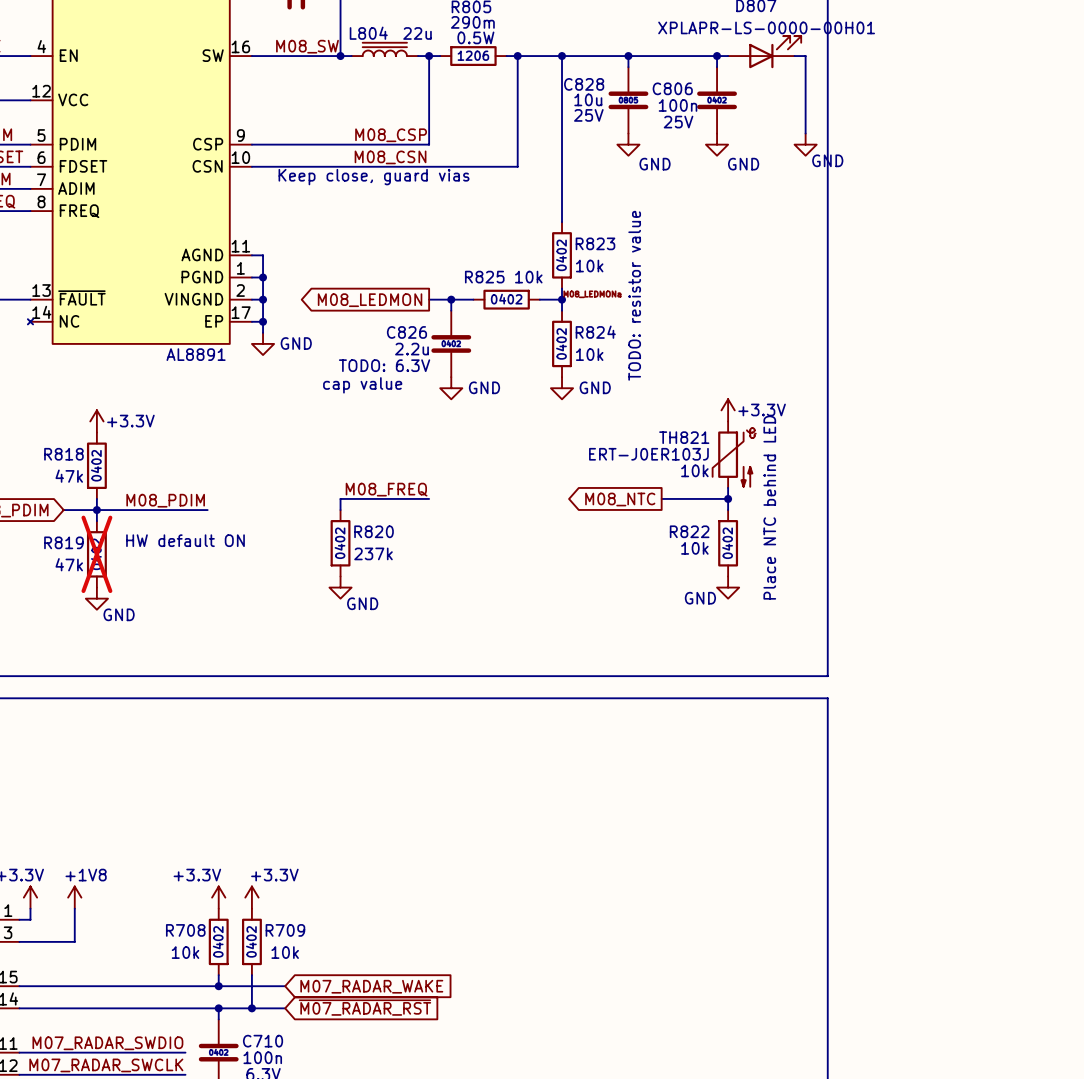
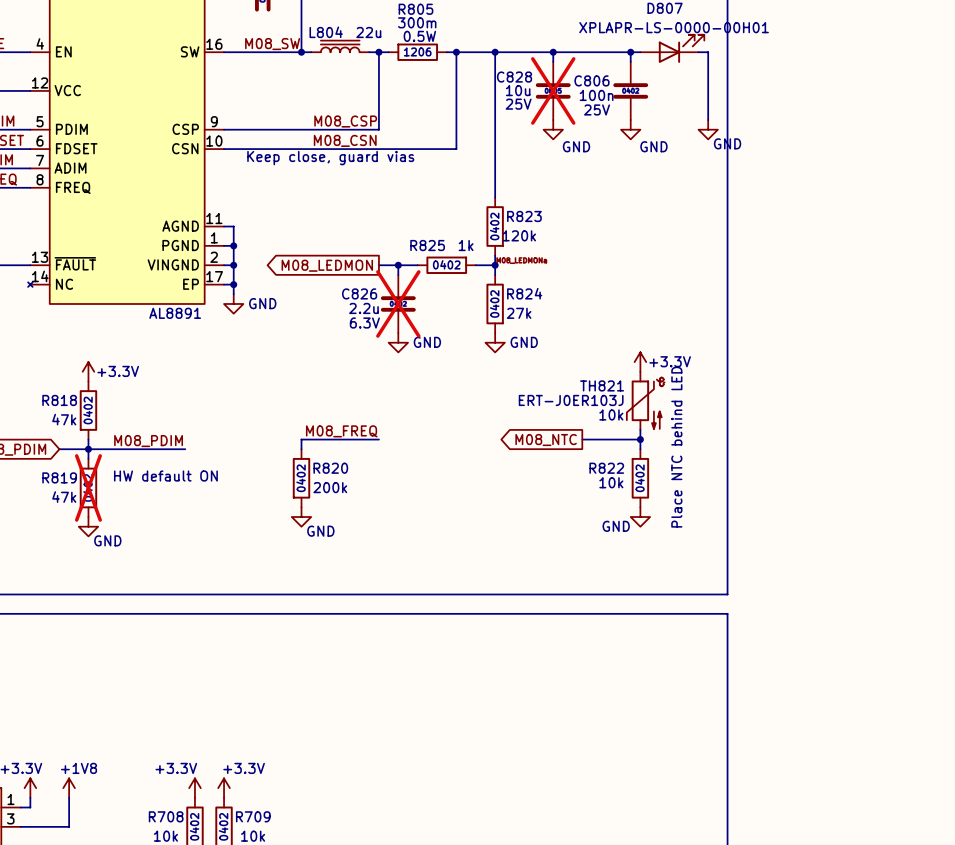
R805 value: 290m (472, 22) -> 300m (417, 22)
C828 do-not-place cross: none -> (553, 90)
R823 value: 10k (589, 266) -> 120k (519, 235)
R825 value: 10k (528, 277) -> 1k (466, 245)
text: TODO: resistor value (634, 295) -> none
C826 do-not-place cross: none -> (398, 303)
R824 value: 10k (589, 354) -> 27k (519, 313)
text: TODO: (362, 365) -> none
text: cap value (362, 385) -> none
R820 value: 237k (373, 553) -> 200k (330, 487)

